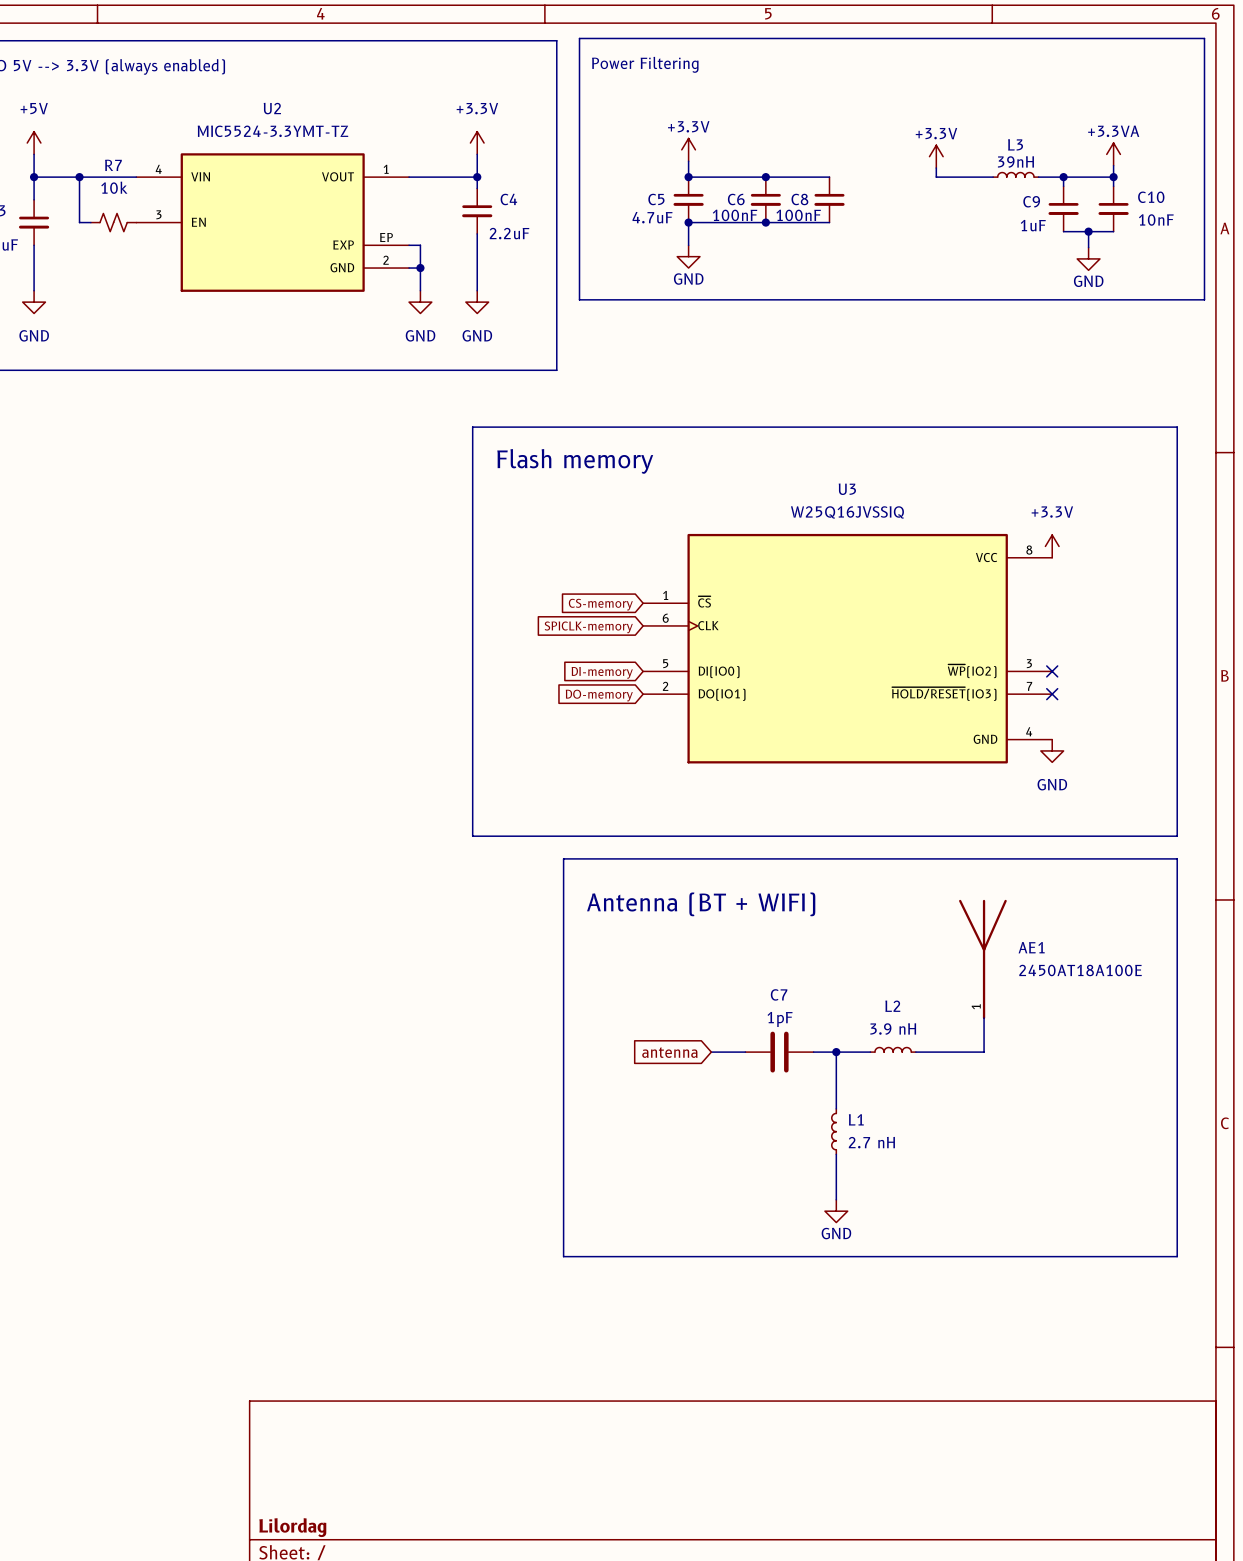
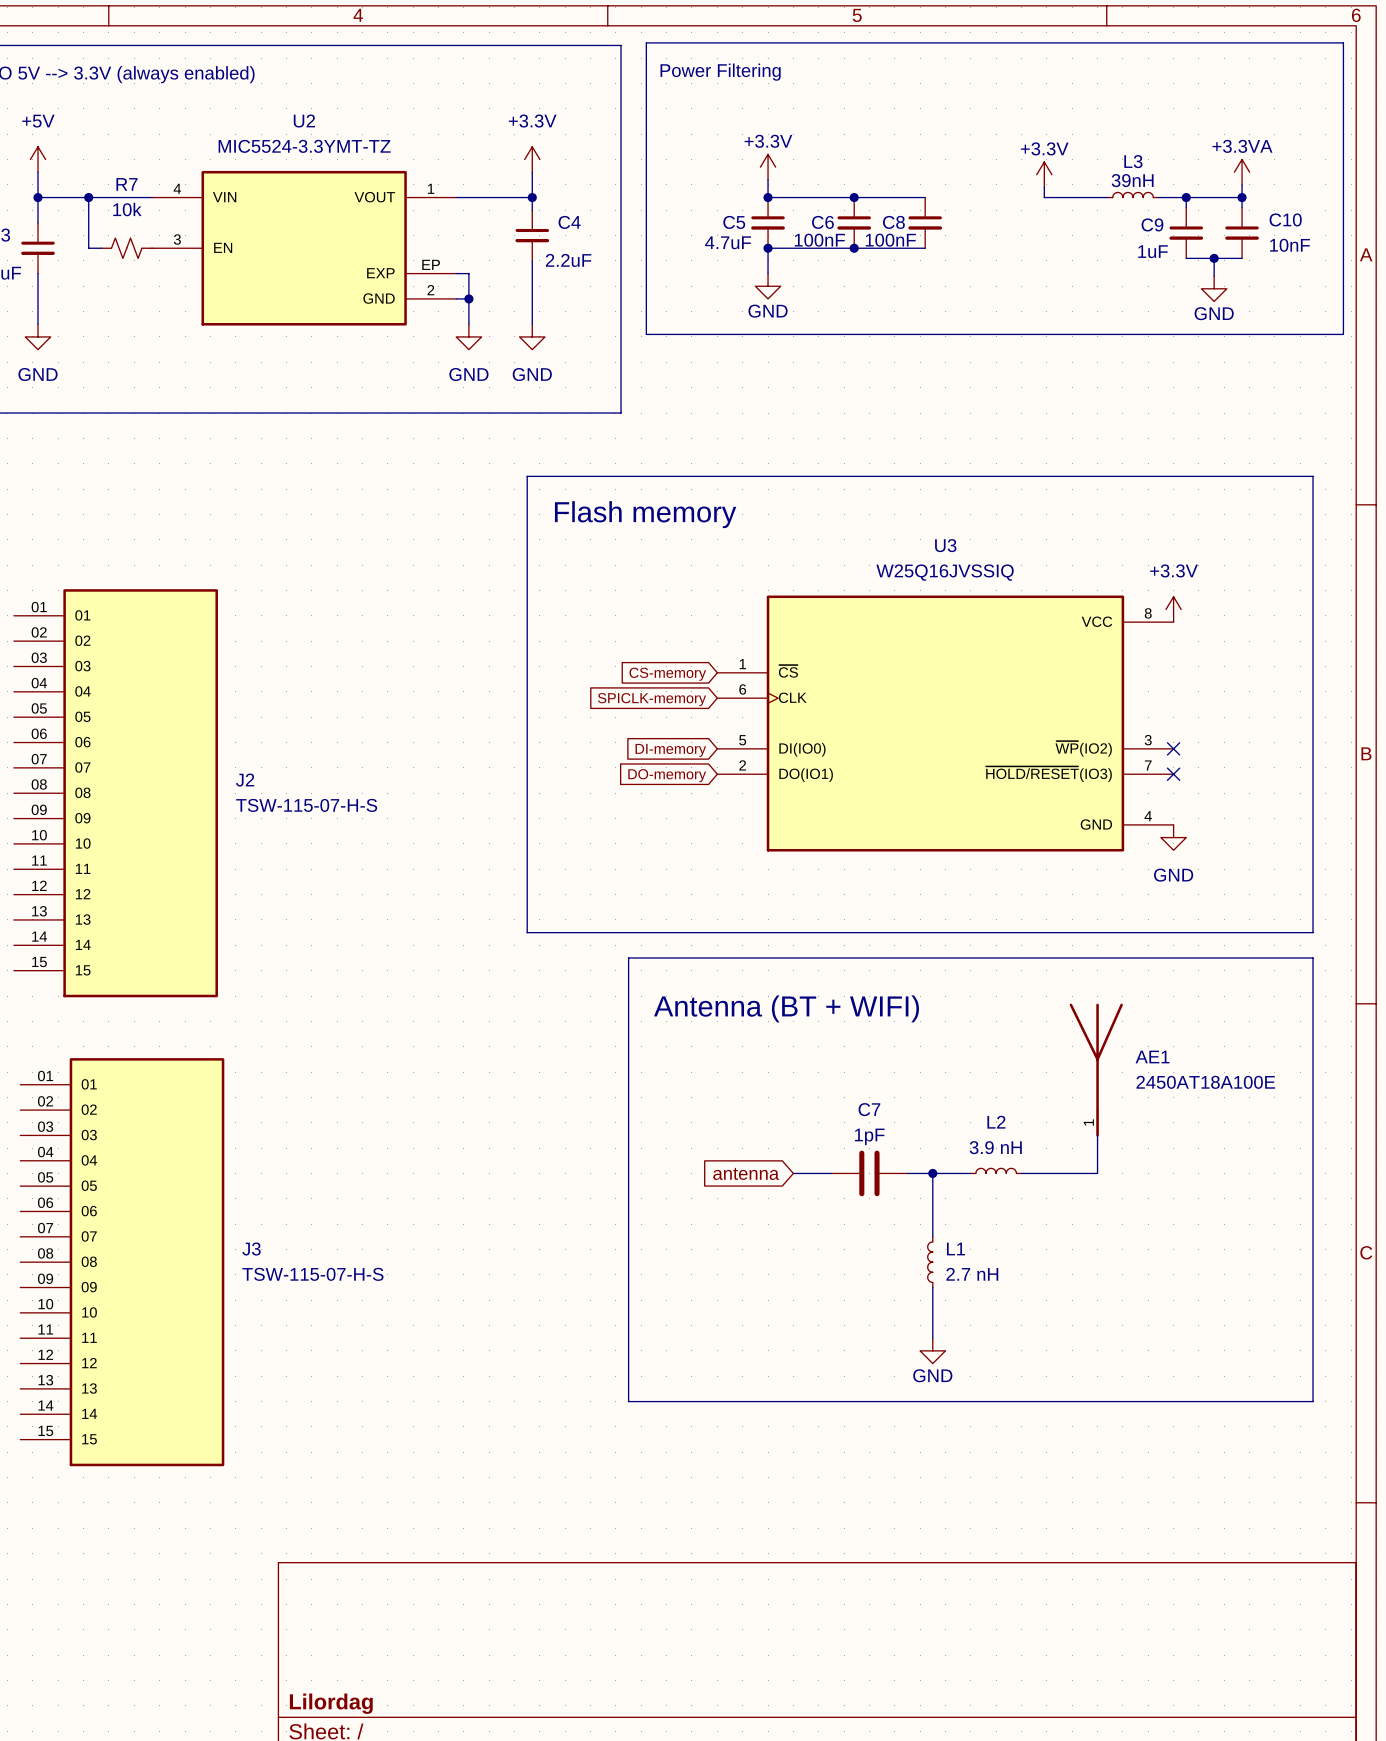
J2: none -> TSW-115-07-H-S (115, 793)
J3: none -> TSW-115-07-H-S (122, 1262)

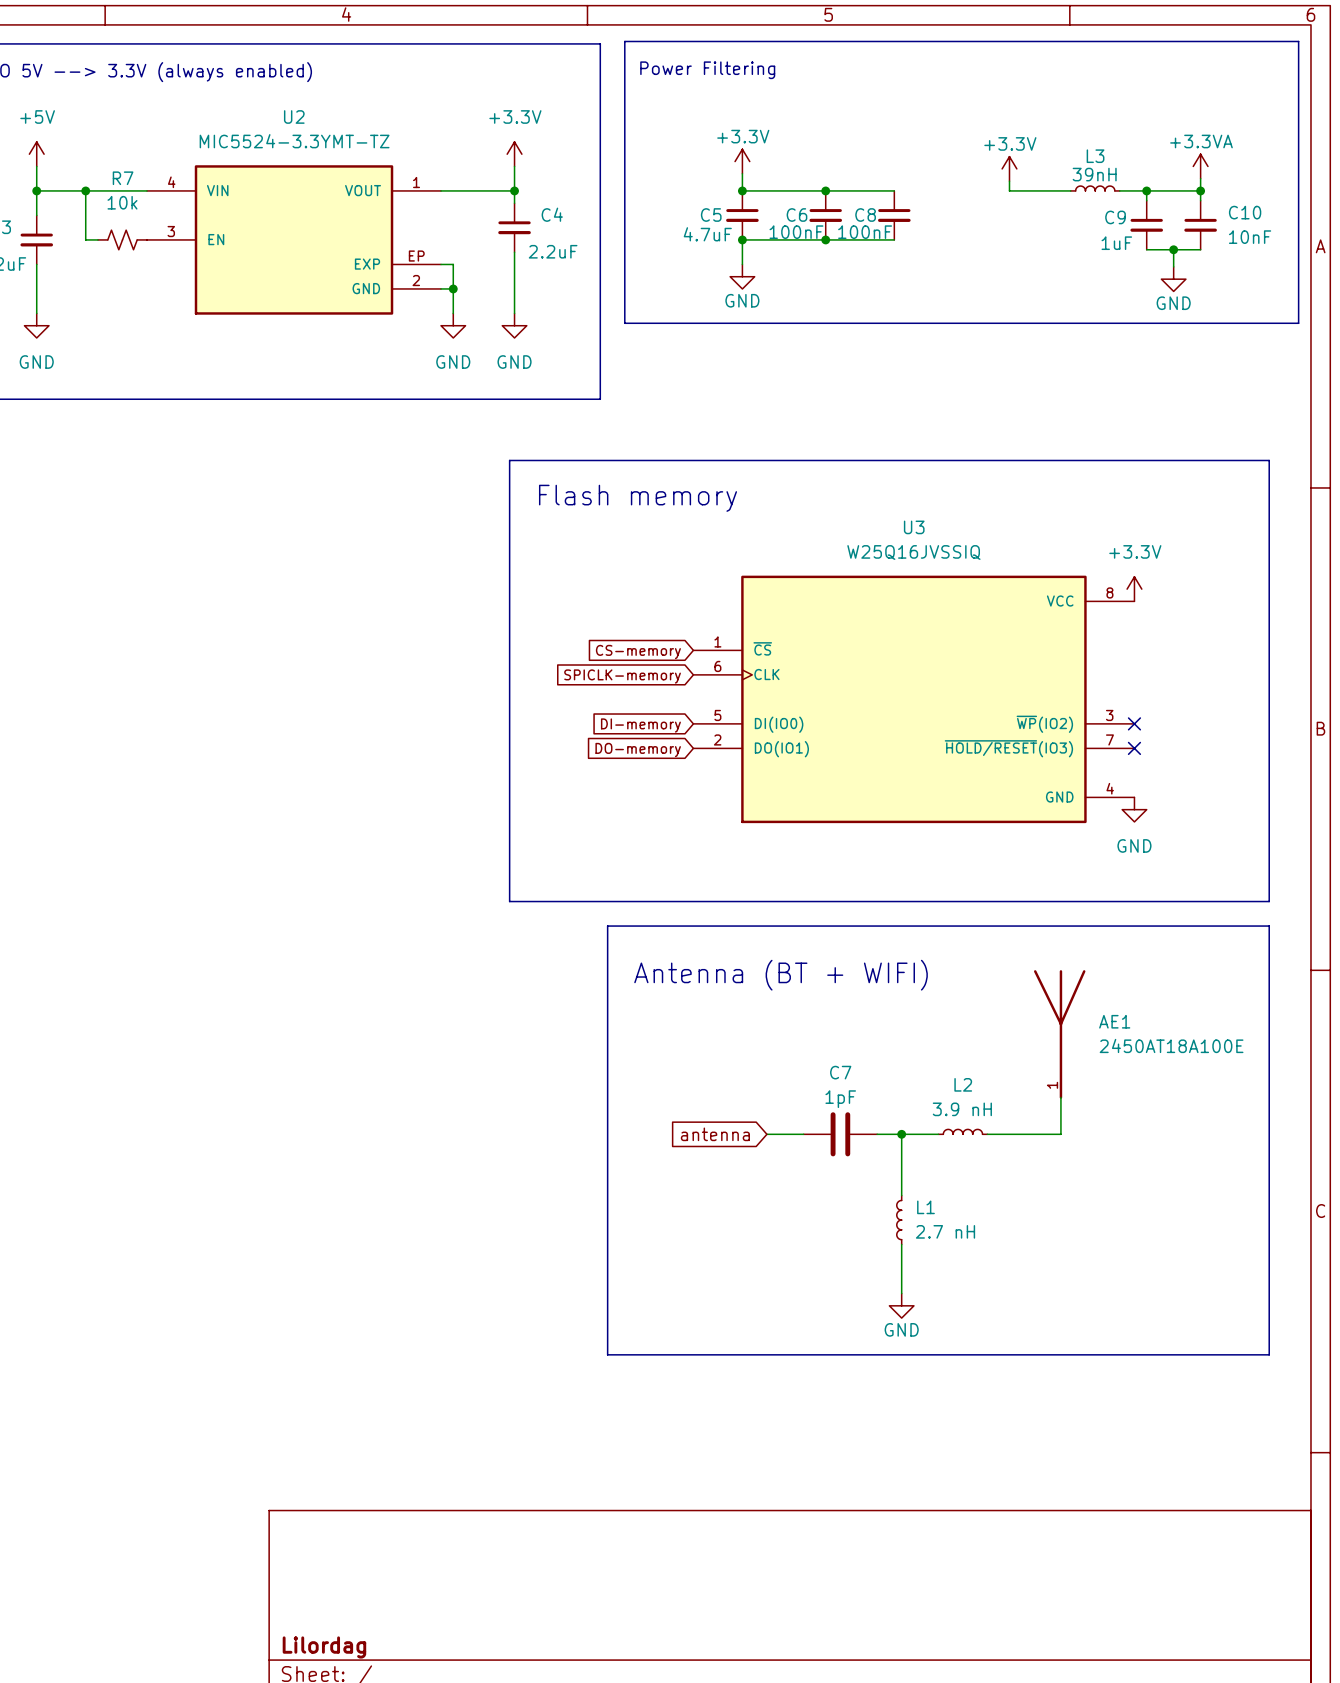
J2: TSW-115-07-H-S (115, 793) -> none
J3: TSW-115-07-H-S (122, 1262) -> none

